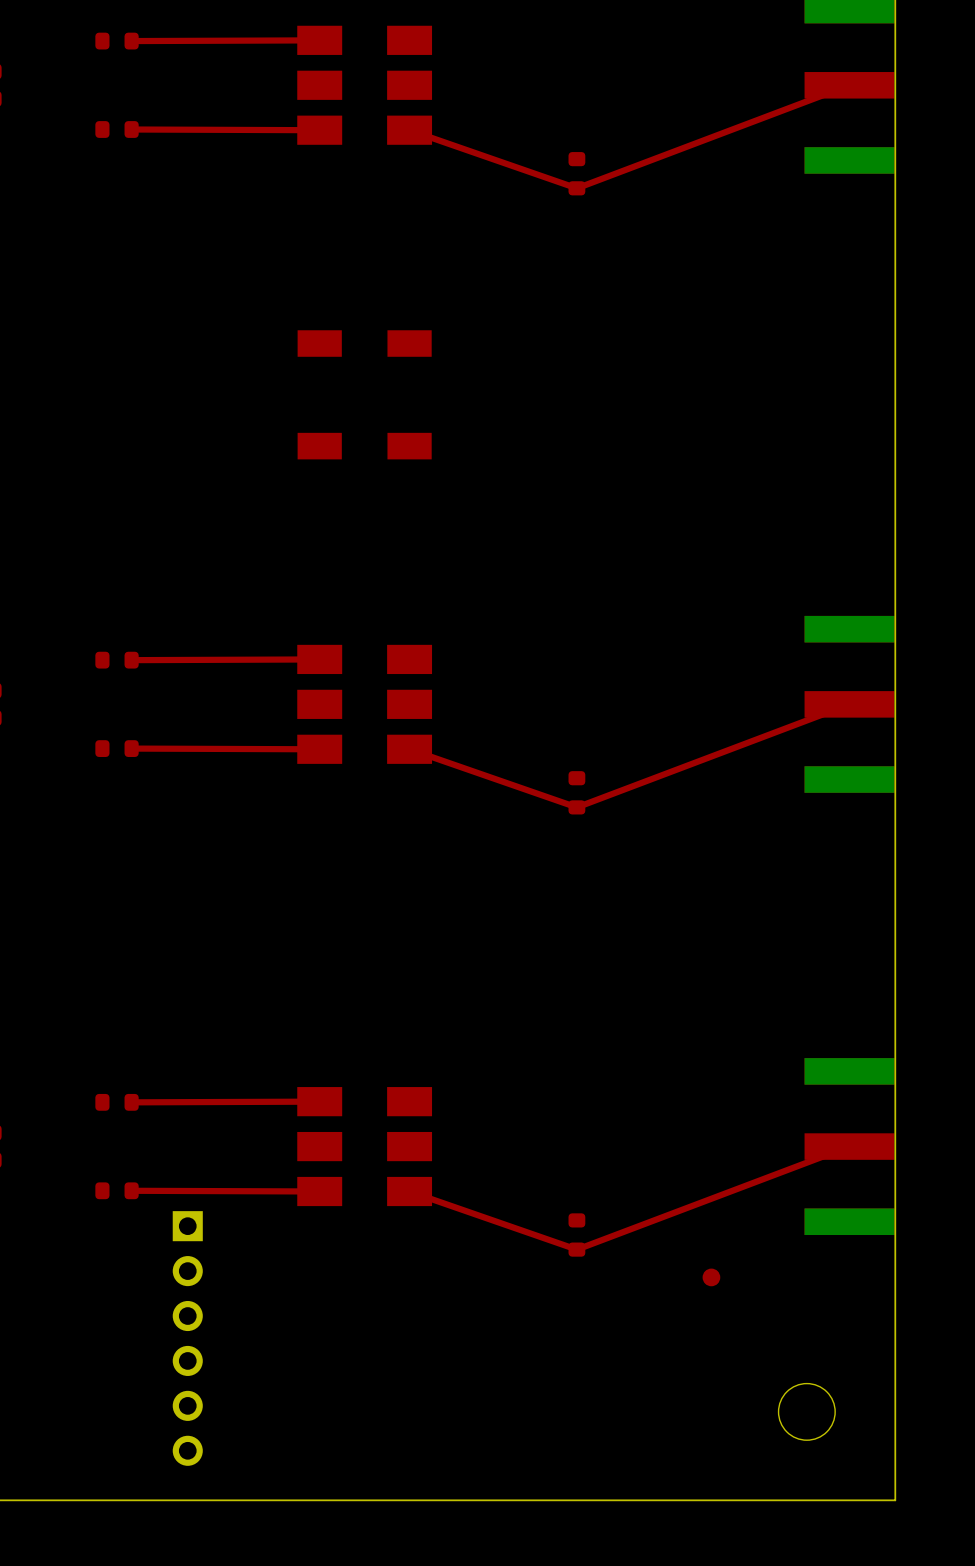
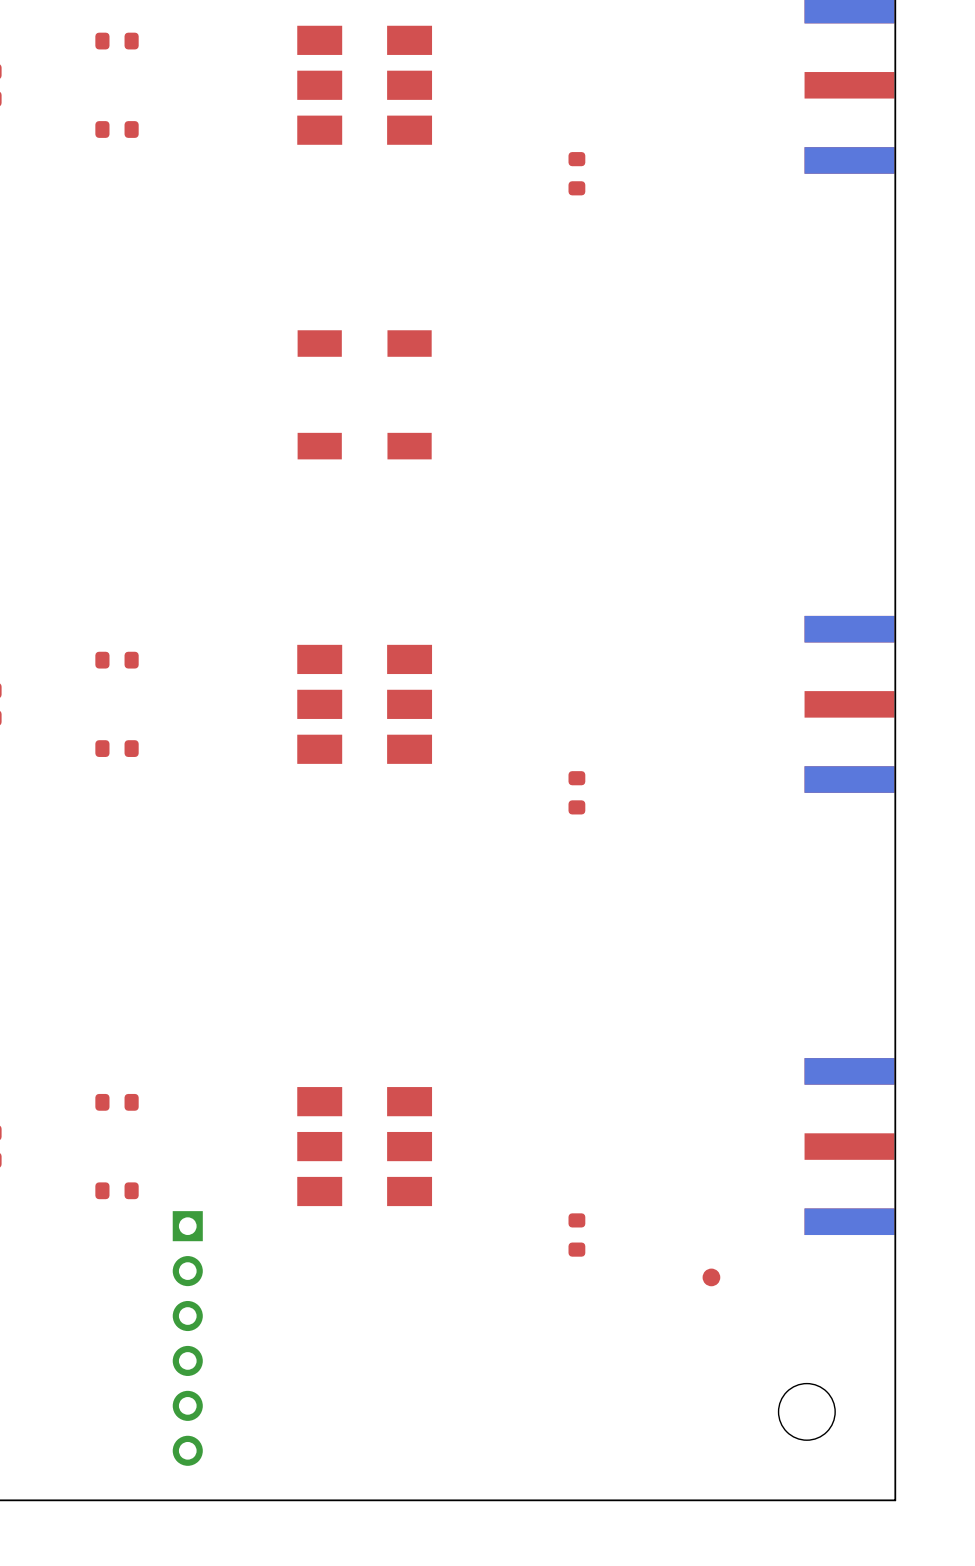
top track: (319, 40) (131, 41) -> none
top track: (849, 85) (576, 188) (409, 130) -> none
top track: (131, 129) (319, 130) -> none
top track: (319, 659) (131, 660) -> none
top track: (849, 704) (576, 807) (409, 749) -> none
top track: (131, 748) (319, 749) -> none
top track: (319, 1101) (131, 1102) -> none
top track: (849, 1146) (576, 1249) (409, 1191) -> none
top track: (131, 1190) (319, 1191) -> none

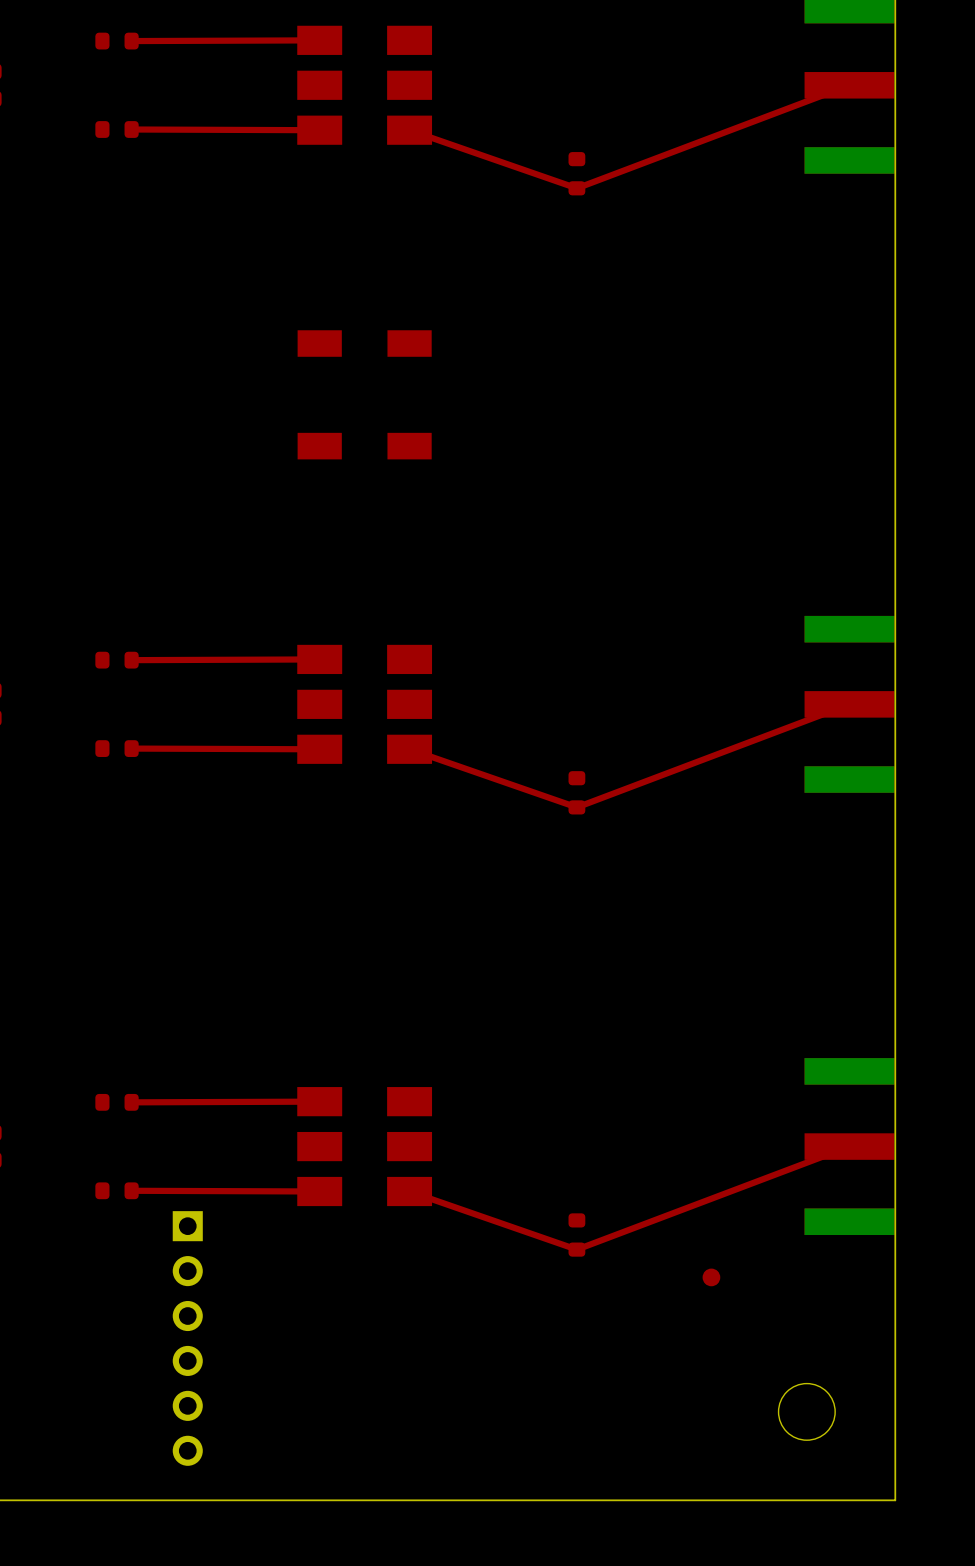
top track: none -> (319, 40) (131, 41)
top track: none -> (849, 85) (576, 188) (409, 130)
top track: none -> (131, 129) (319, 130)
top track: none -> (319, 659) (131, 660)
top track: none -> (849, 704) (576, 807) (409, 749)
top track: none -> (131, 748) (319, 749)
top track: none -> (319, 1101) (131, 1102)
top track: none -> (849, 1146) (576, 1249) (409, 1191)
top track: none -> (131, 1190) (319, 1191)

